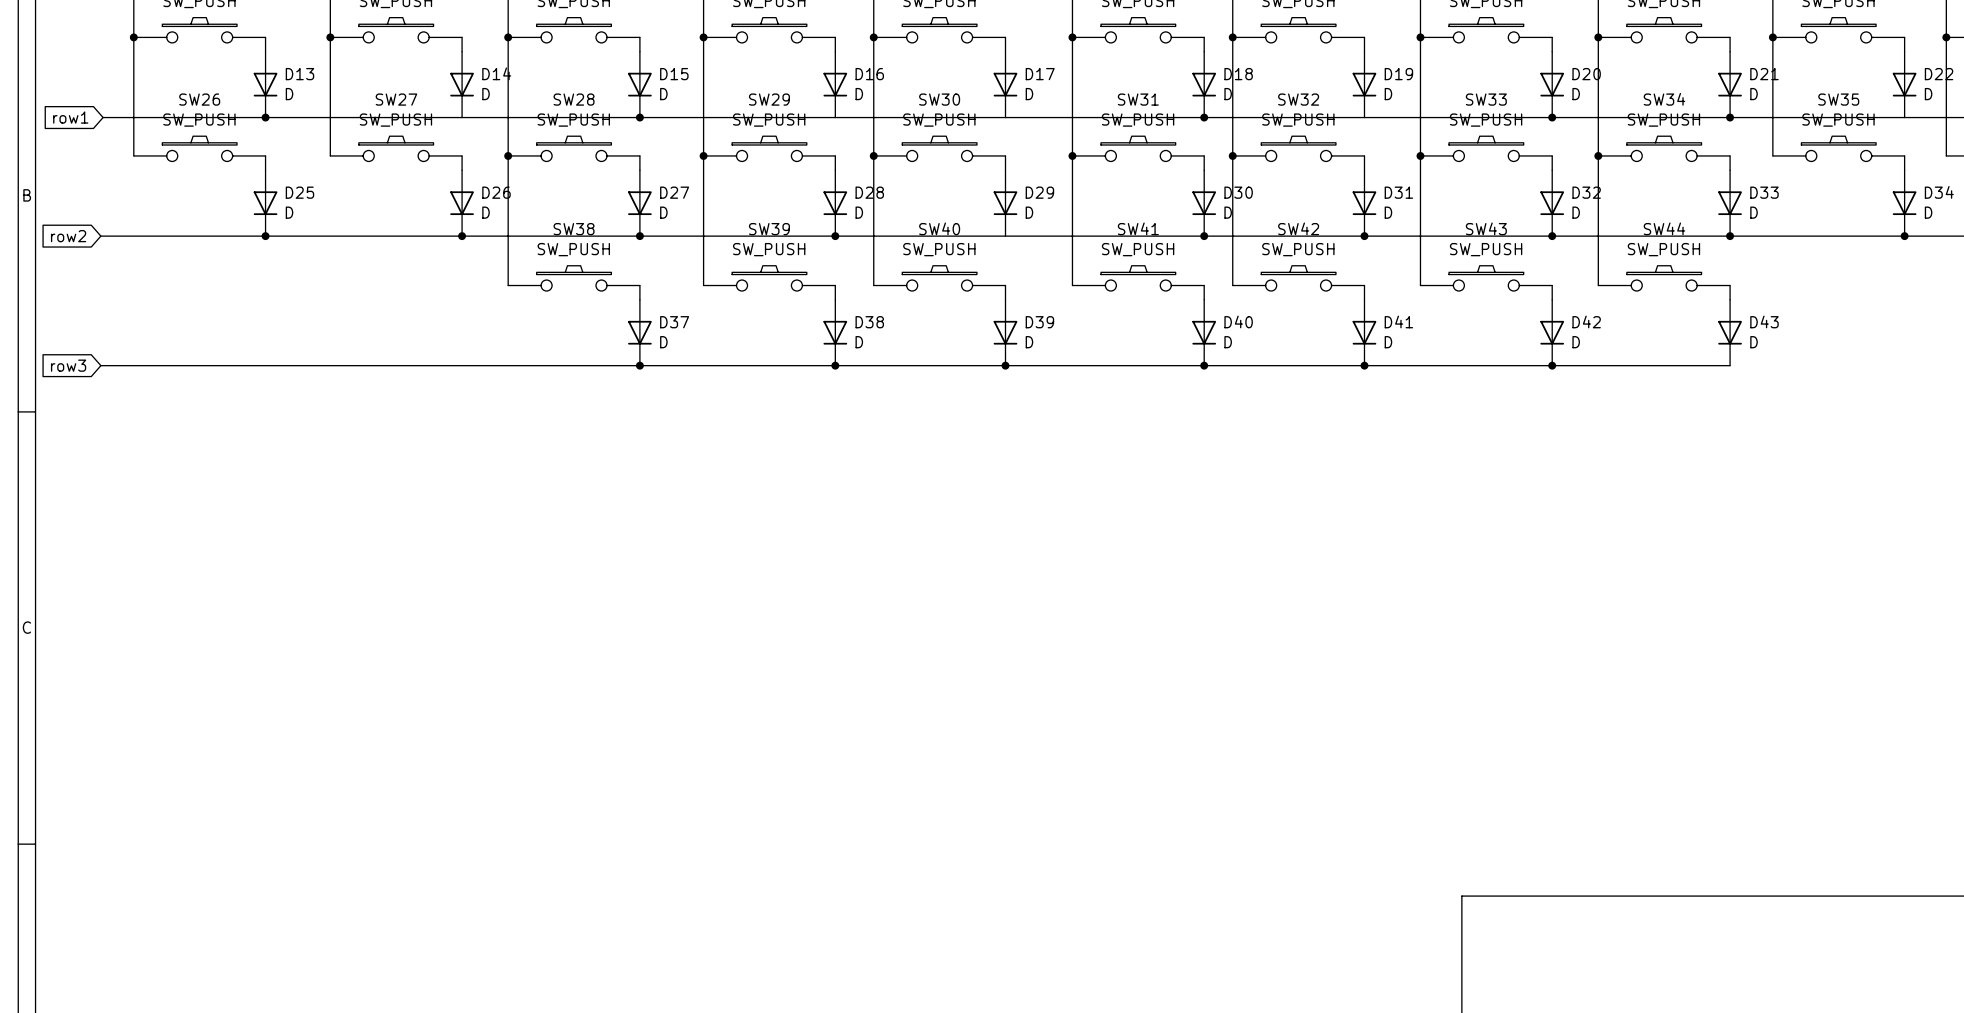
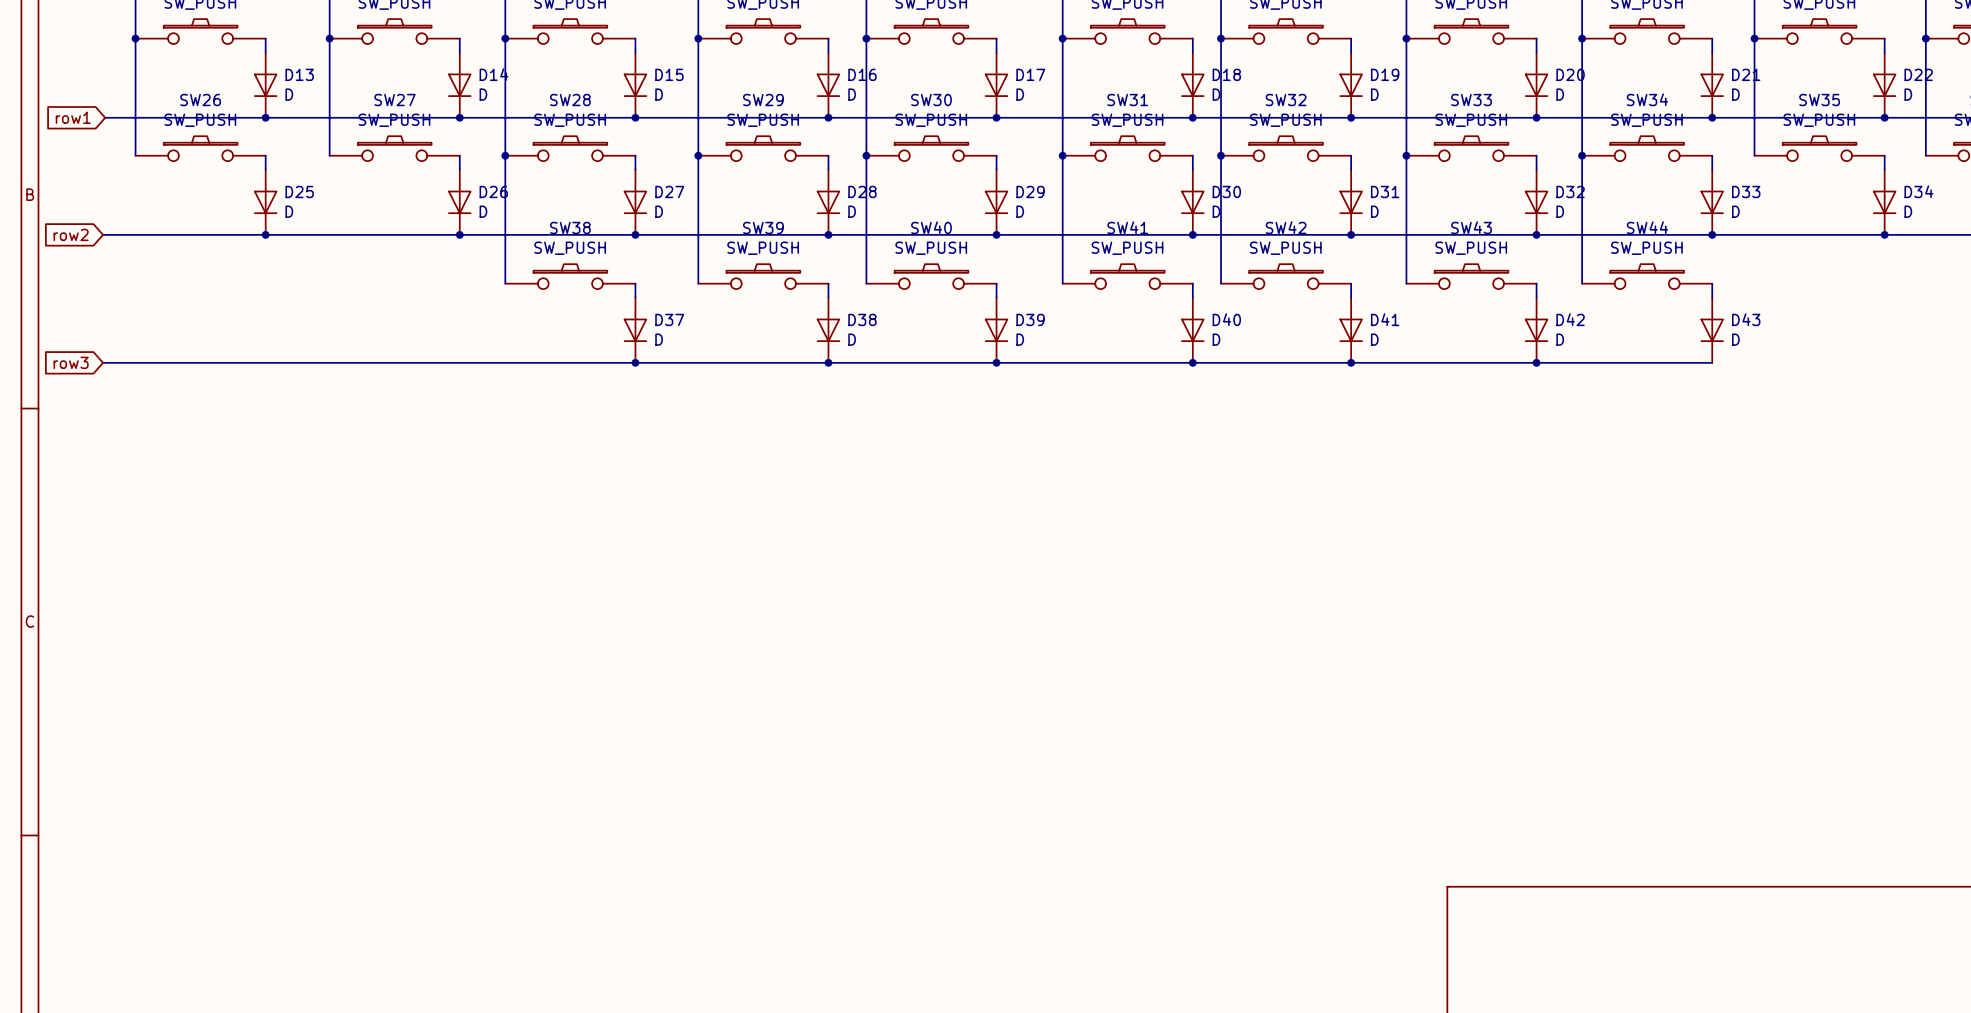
junction: none -> (459, 117)
junction: none -> (828, 117)
junction: none -> (996, 117)
junction: none -> (1351, 117)
junction: none -> (1884, 117)
junction: none -> (996, 234)

